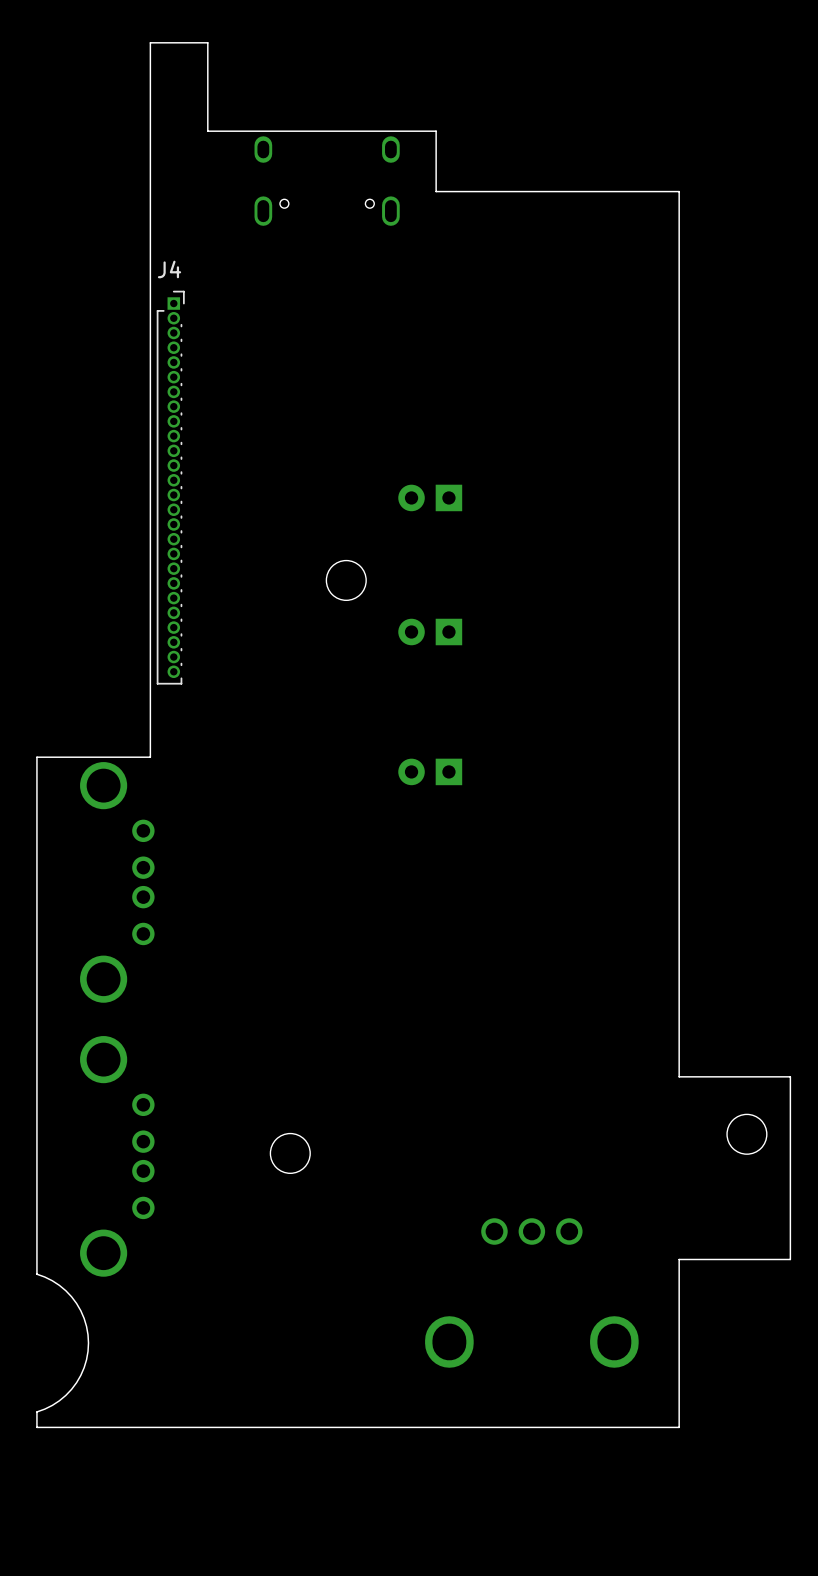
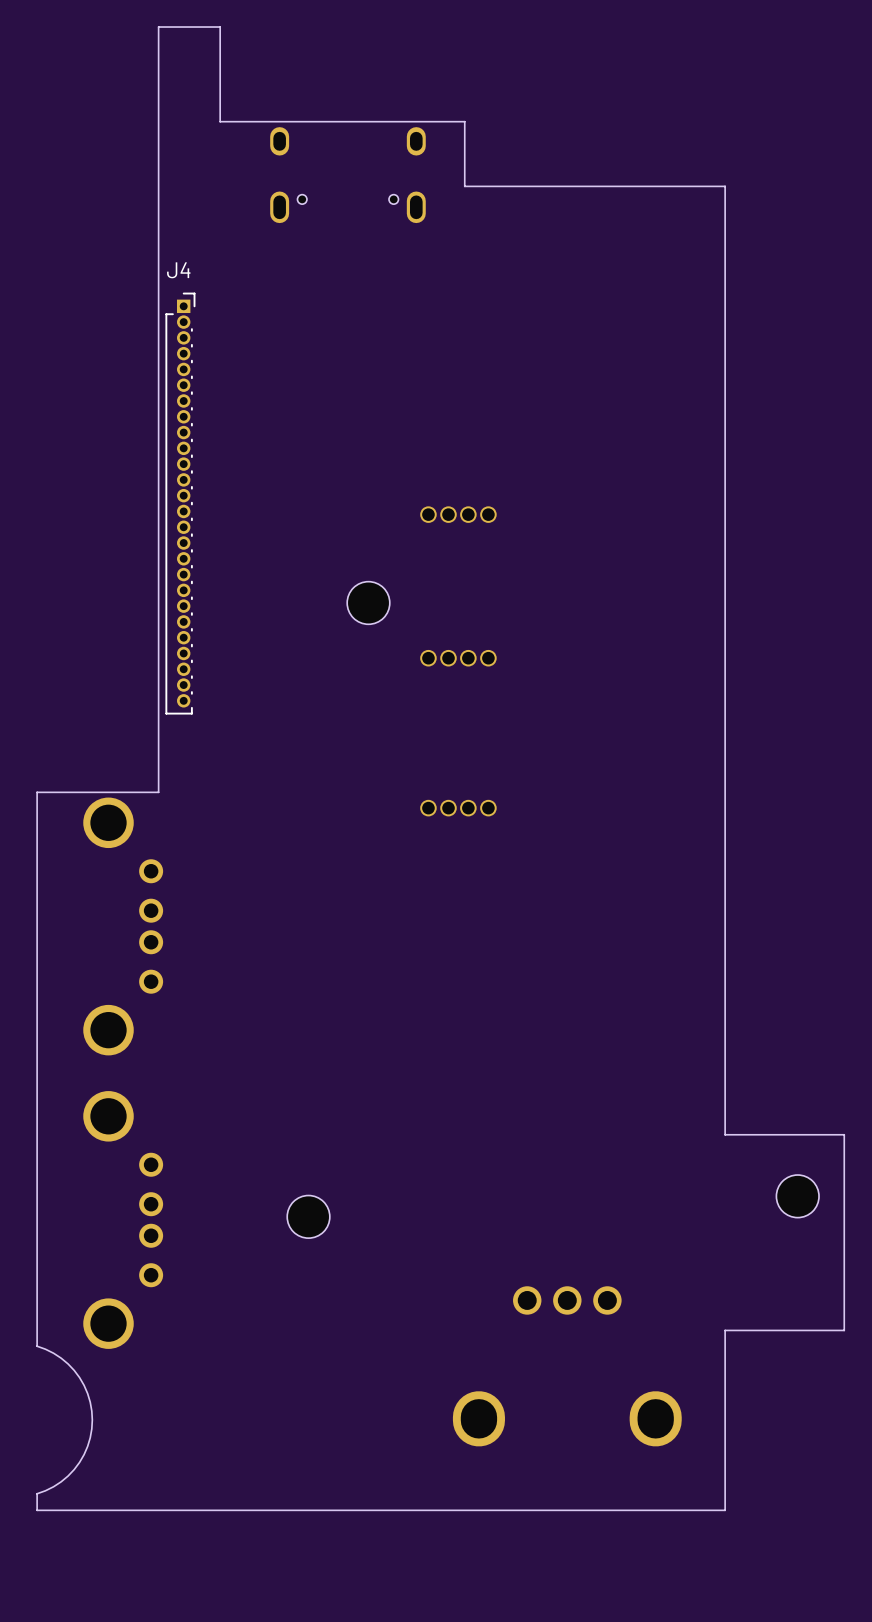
part footprint: [398, 484, 463, 512] -> [420, 506, 497, 523]
part footprint: [398, 618, 463, 646] -> [420, 649, 497, 667]
part footprint: [398, 758, 463, 786] -> [420, 799, 497, 817]

